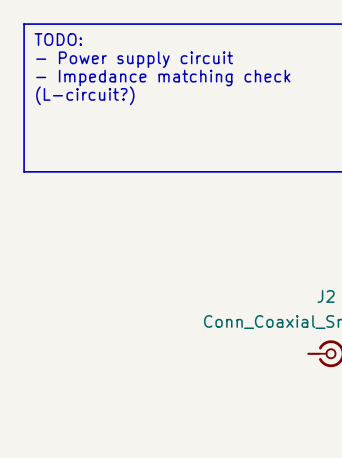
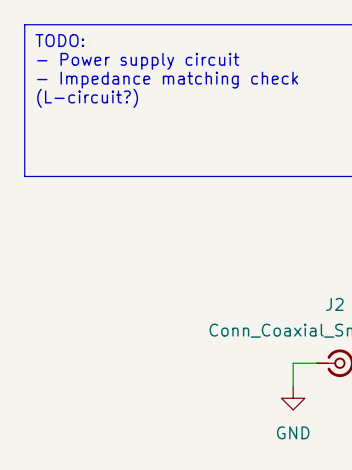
wire: none -> (316, 363) (293, 363) (293, 386)
power symbol: none -> GND (293, 398)

